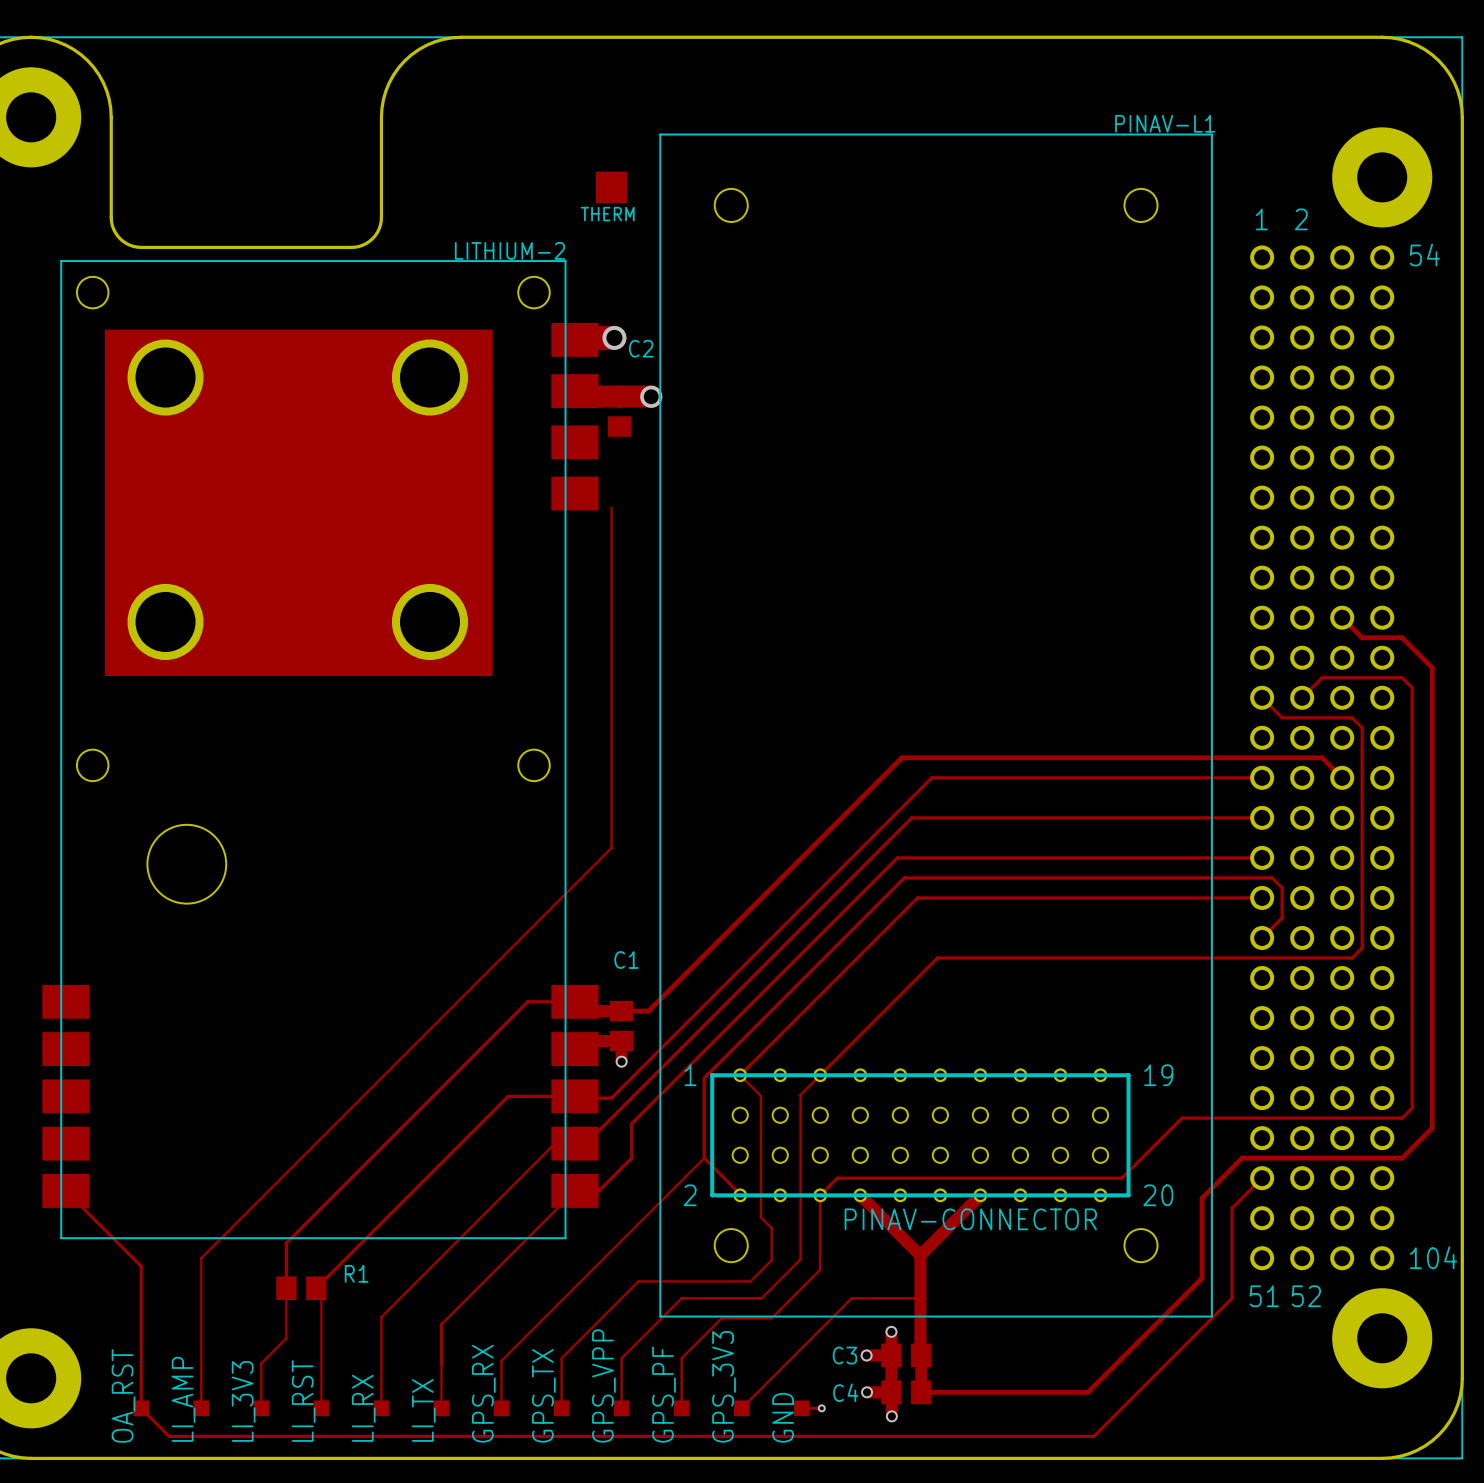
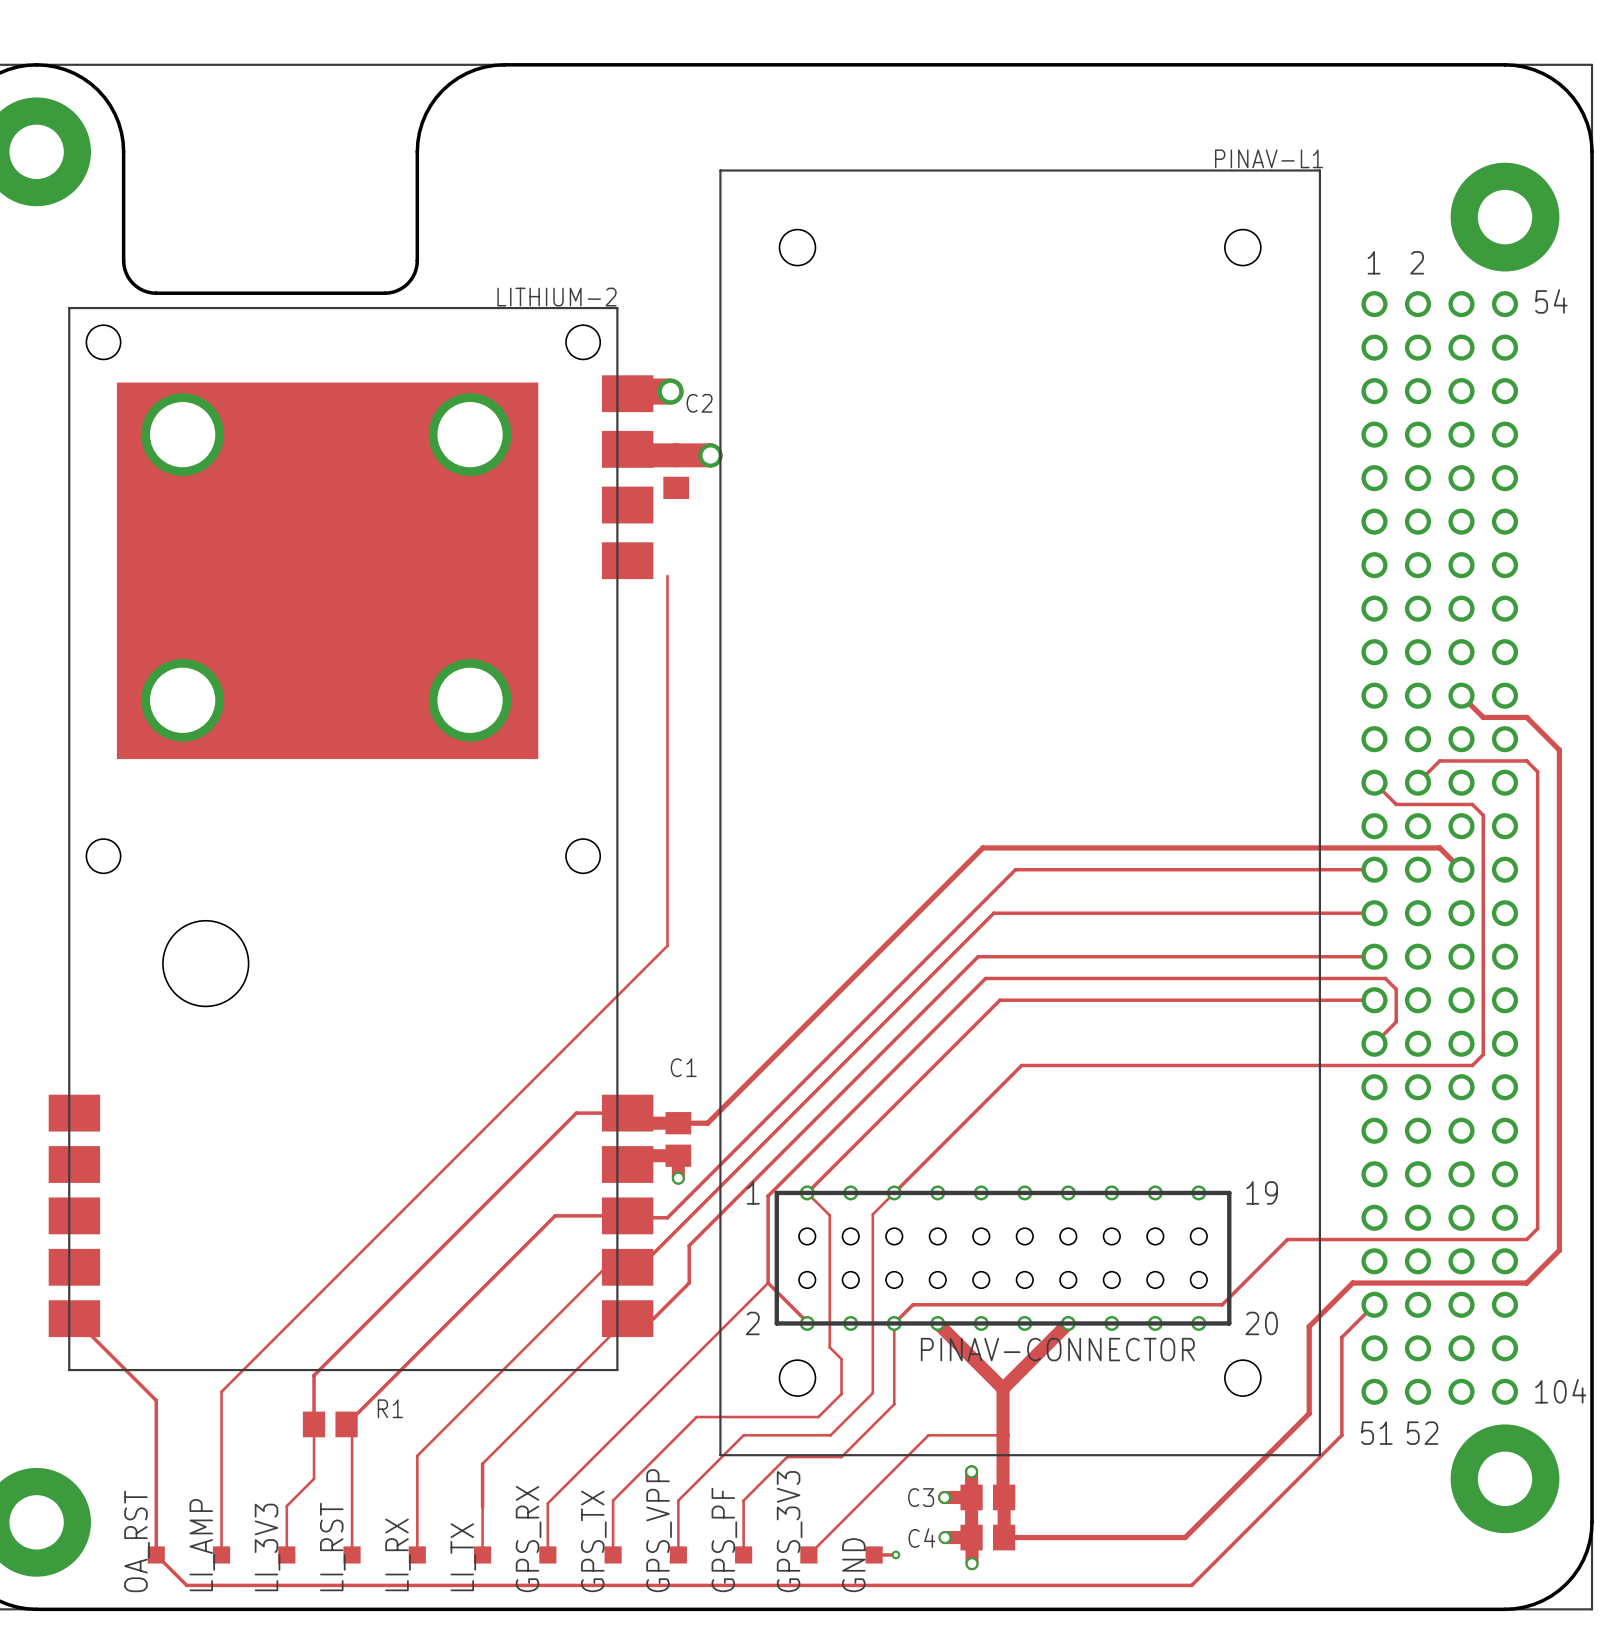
THERM: (611, 187) -> none

